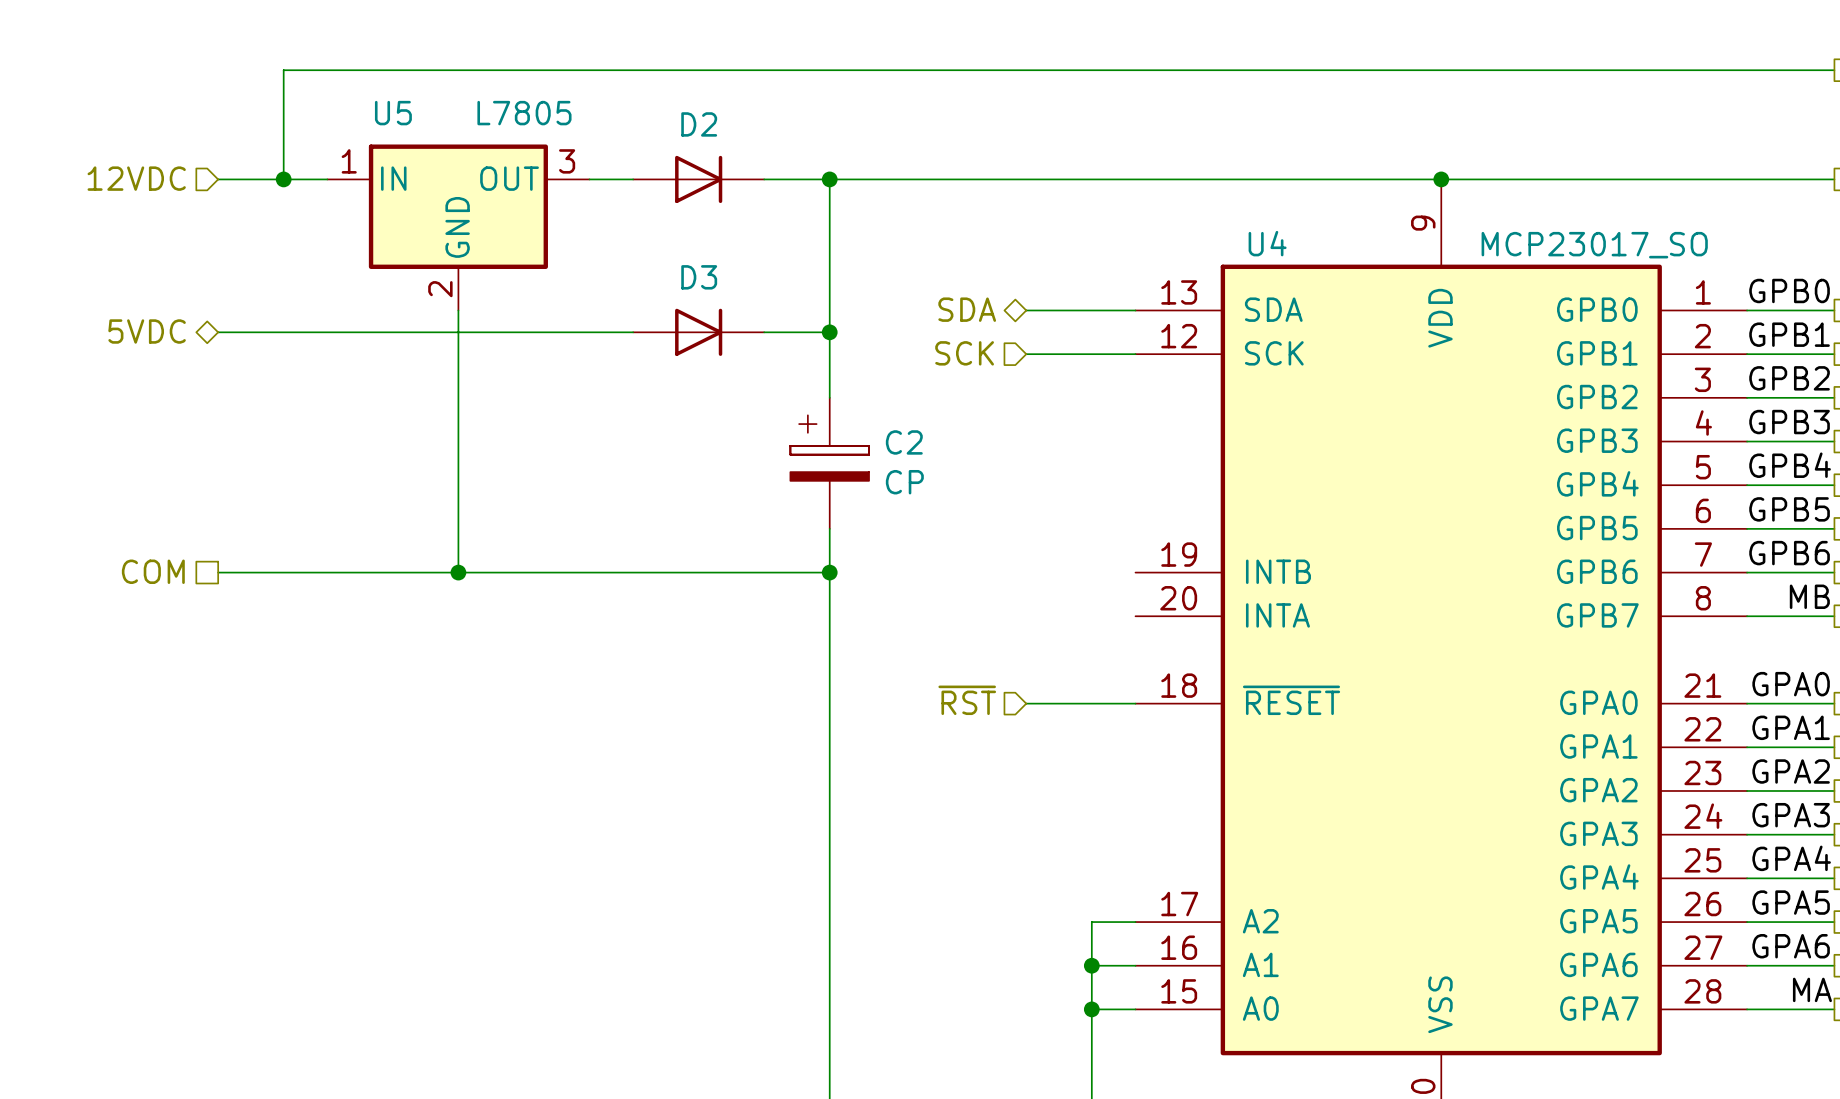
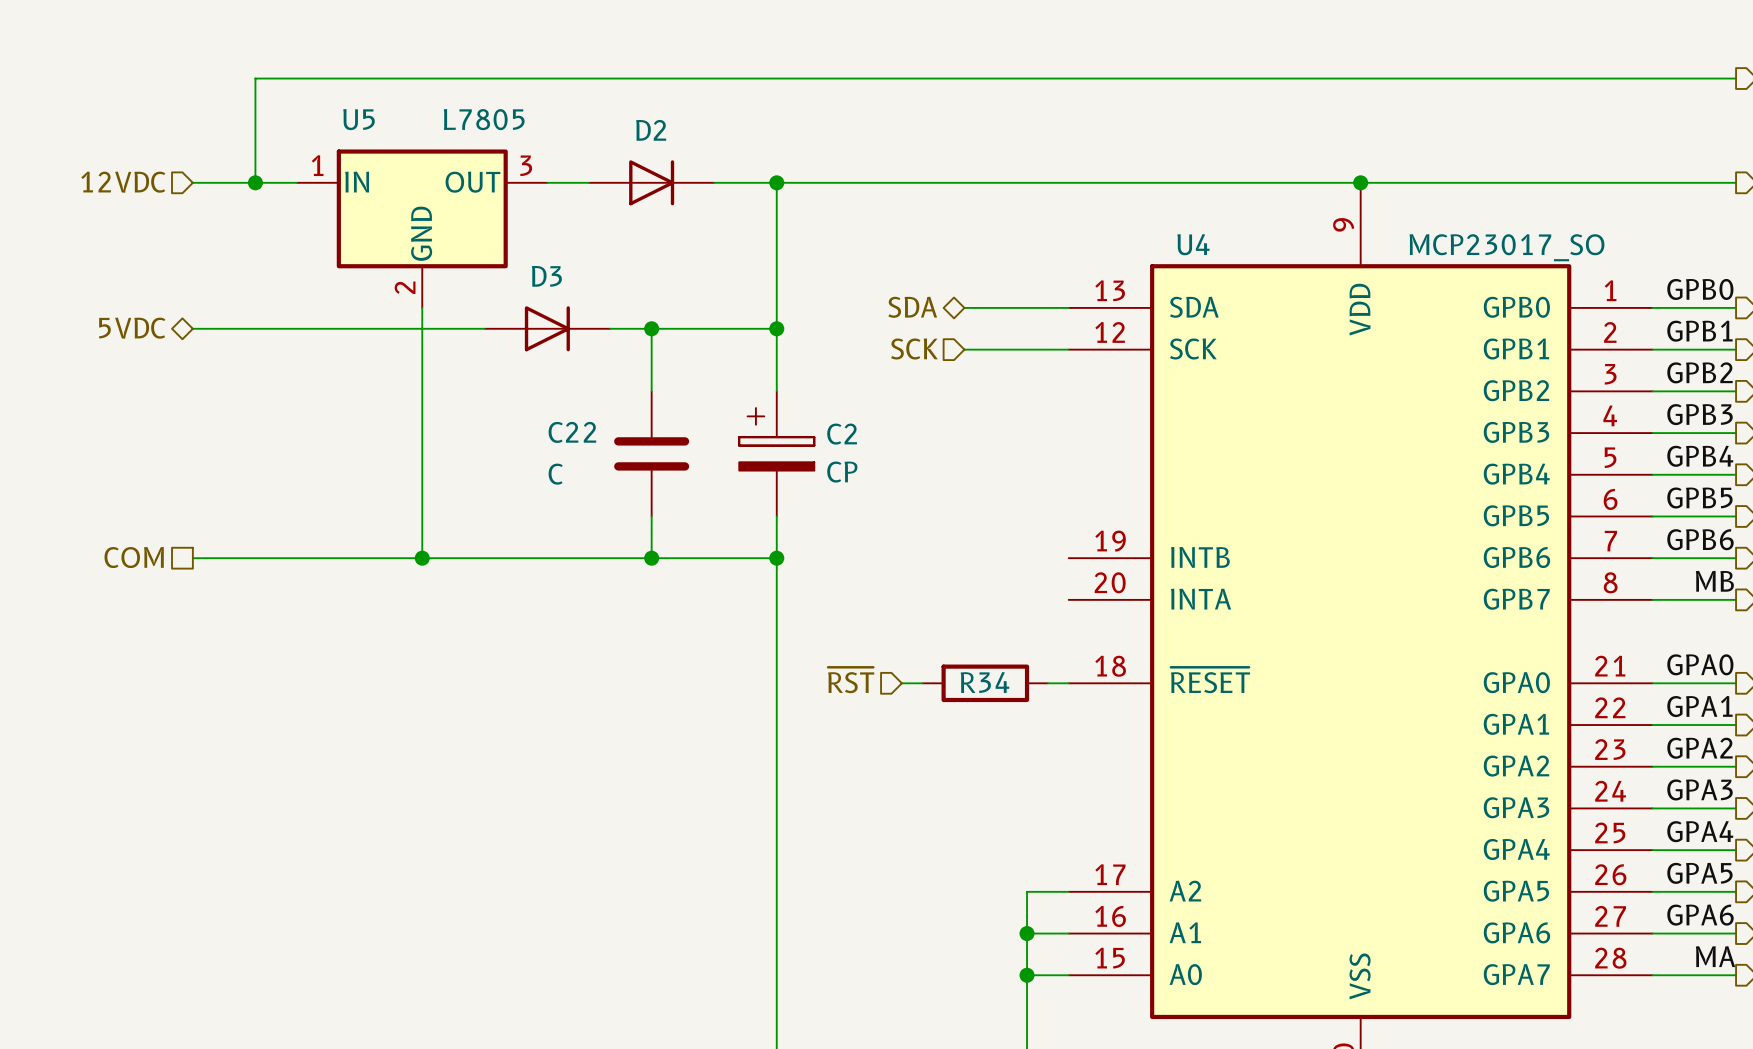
wire: none -> (651, 328) (651, 391)
D3 position: (698, 332) -> (547, 328)
junction: none -> (651, 328)
C22: none -> C (651, 453)
wire: none -> (651, 516) (651, 558)
junction: none -> (651, 558)
hierarchical label position: ~{RST} (967, 700) -> ~{RST} (851, 680)
wire: none -> (901, 683) (922, 683)
wire: (1026, 703) (1113, 703) -> none
R34: none -> (985, 683)

